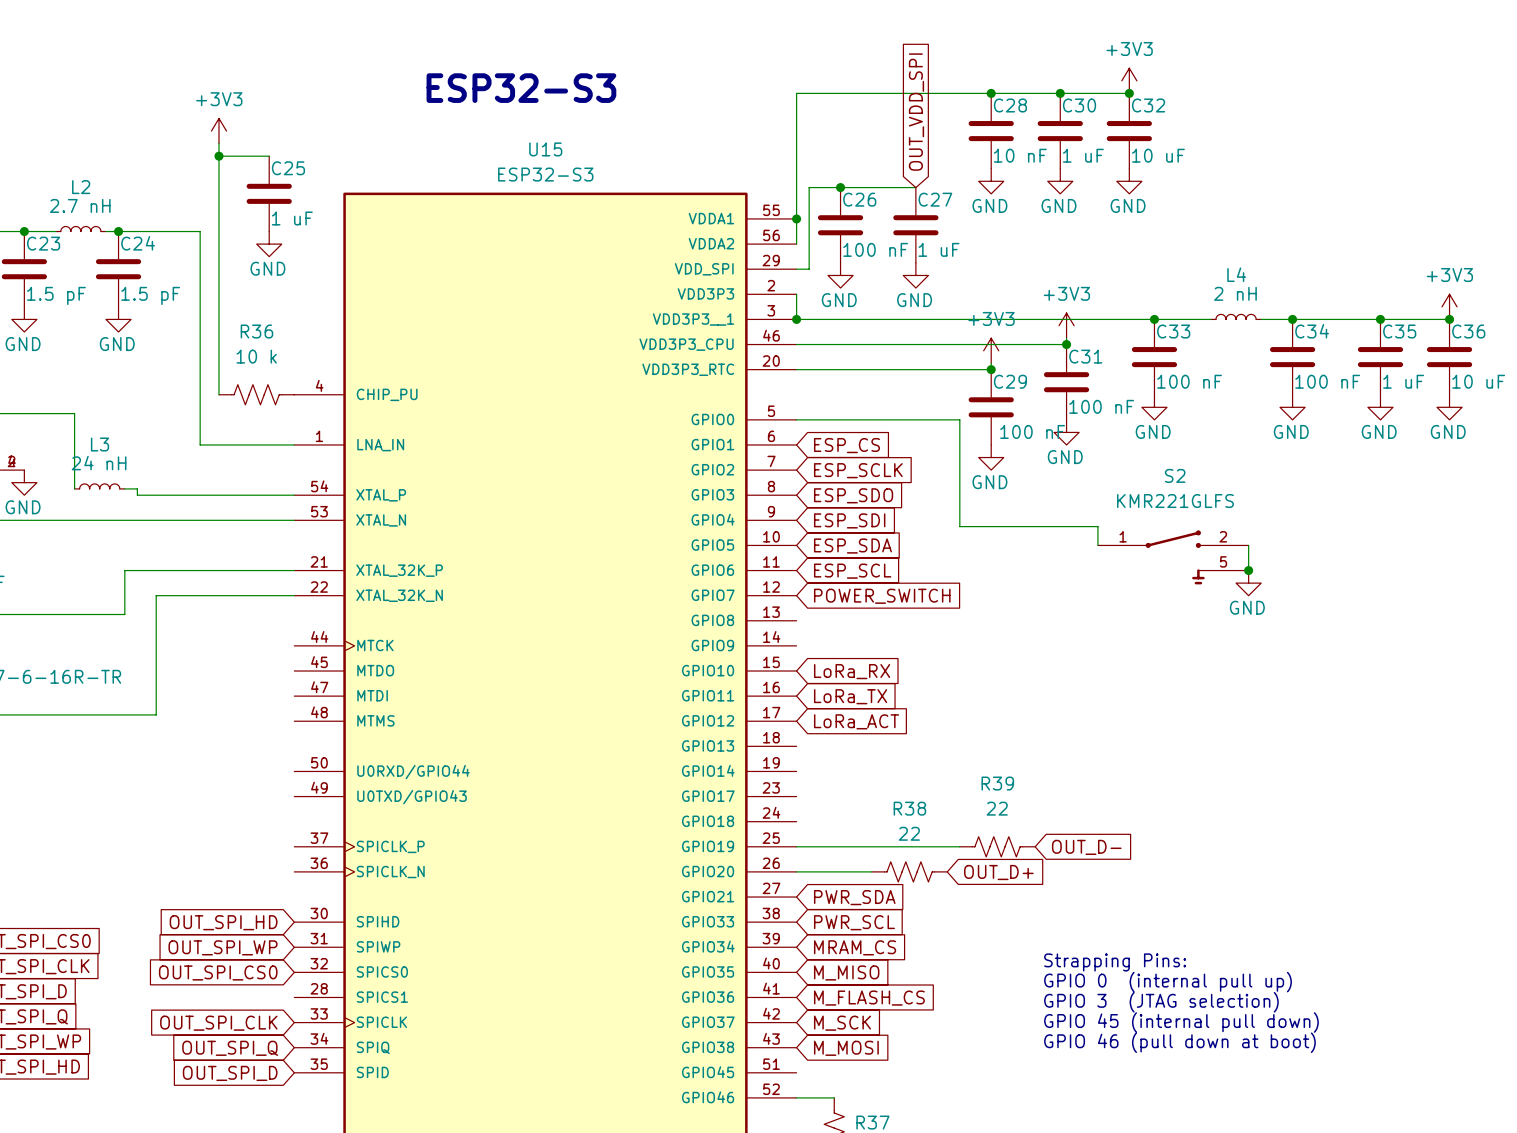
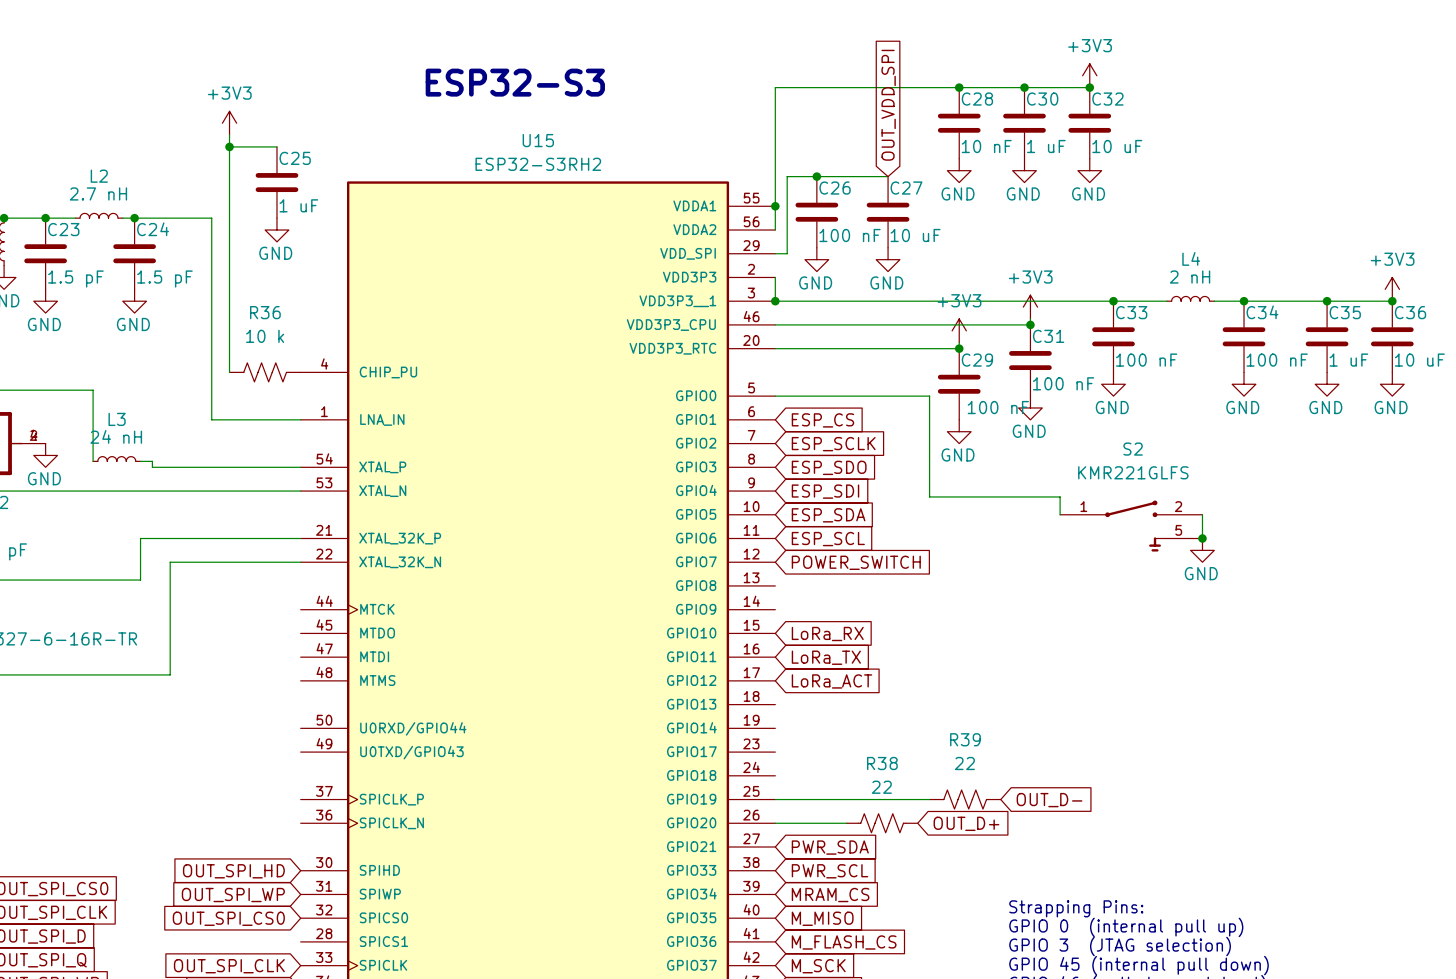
U15 value: ESP32-S3 (545, 174) -> ESP32-S3RH2 (538, 164)
C27 value: 1 uF (938, 249) -> 10 uF (915, 235)

